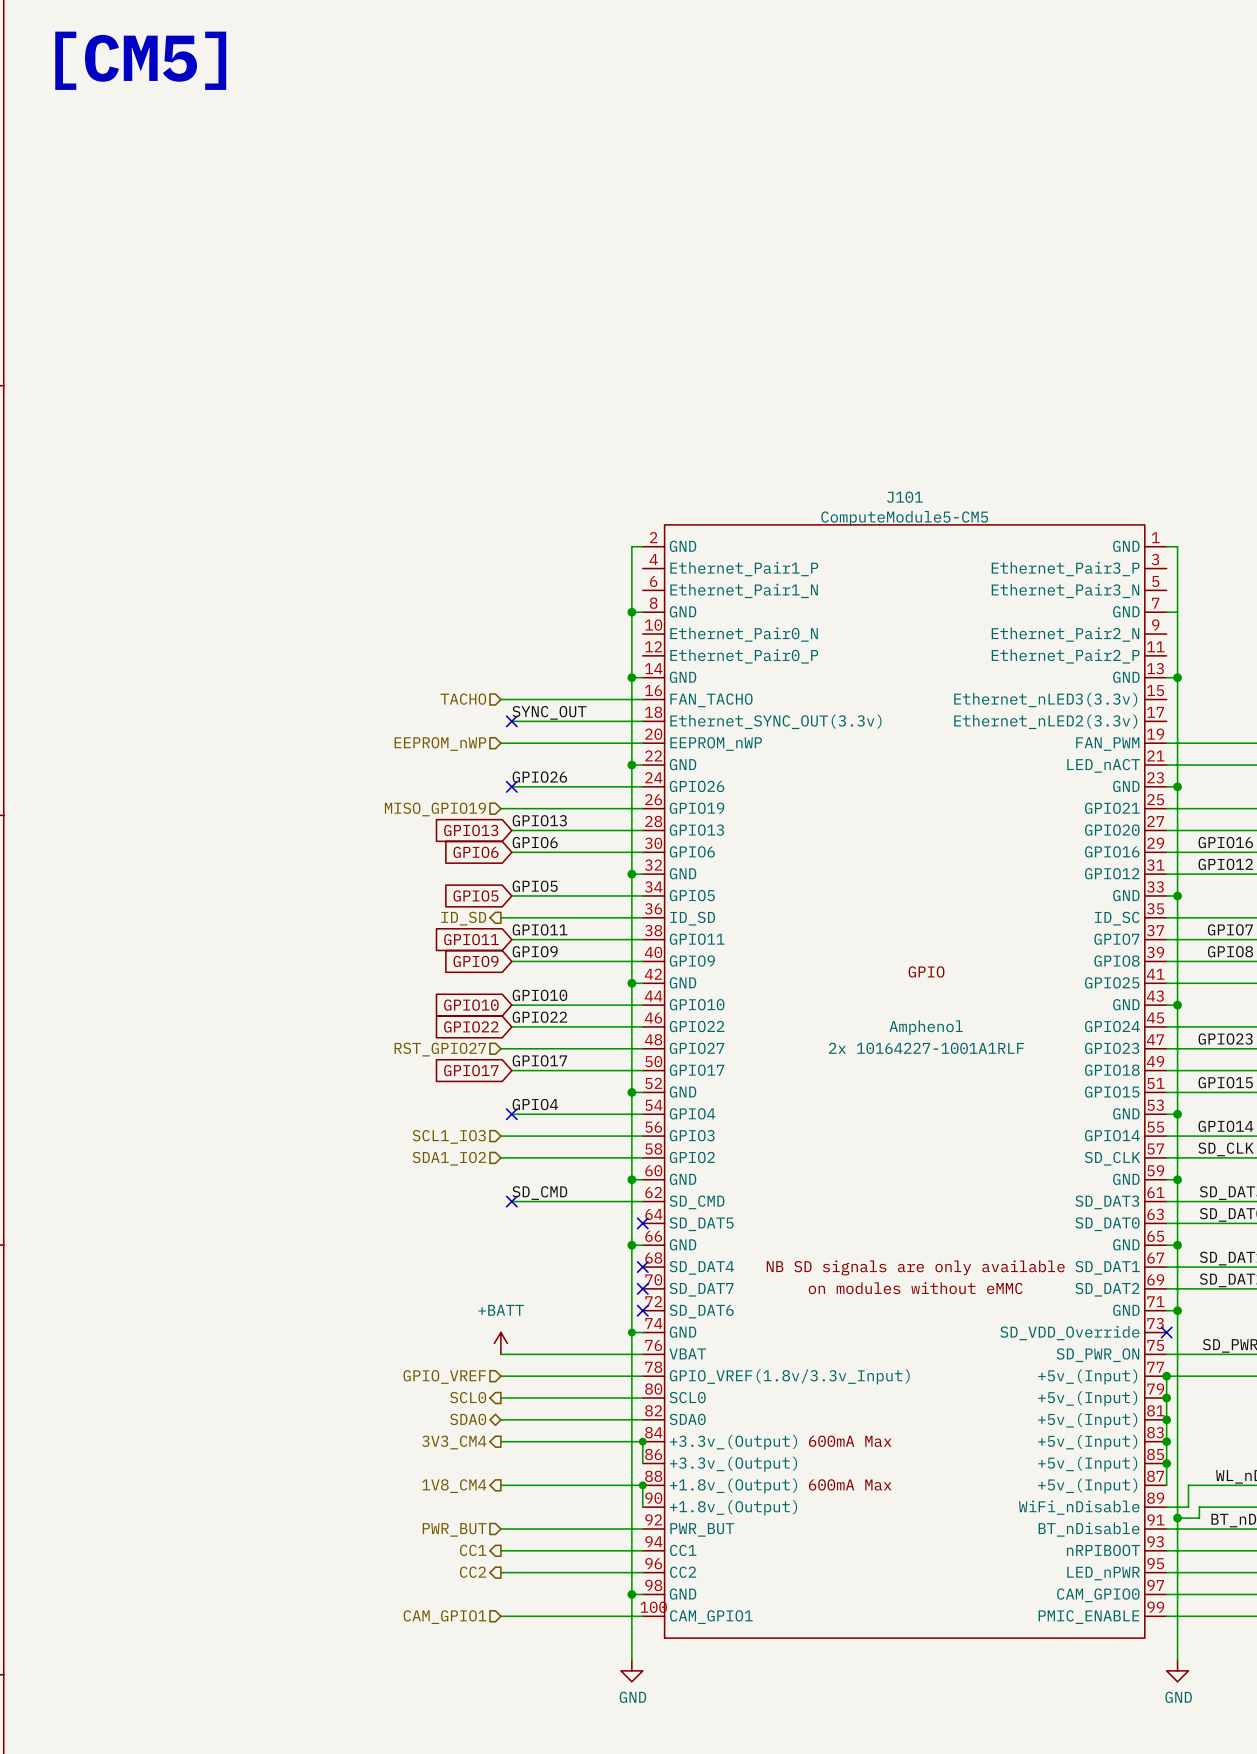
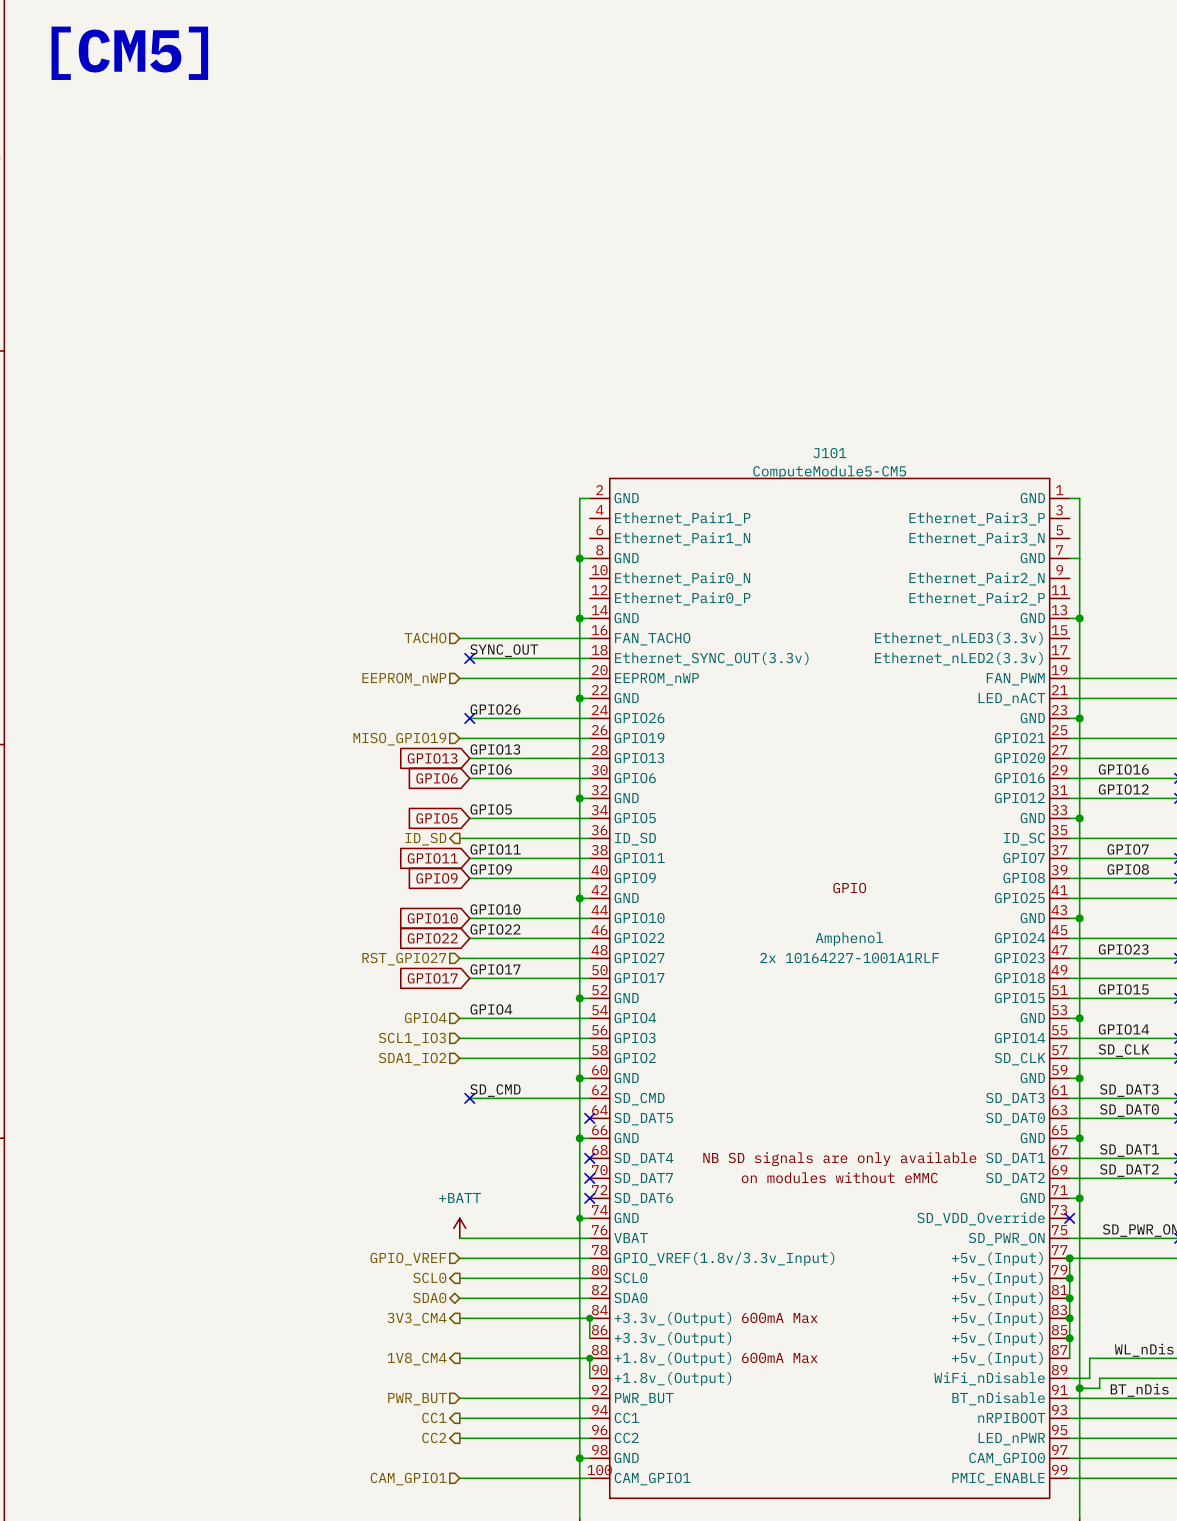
hierarchical label: none -> GPIO4 (425, 1018)
wire: none -> (459, 1018) (469, 1018)
no-connect mark: (511, 1114) -> none

